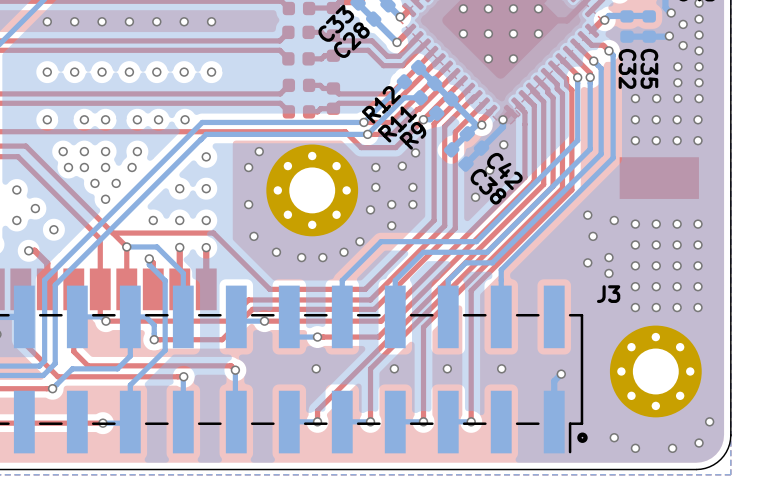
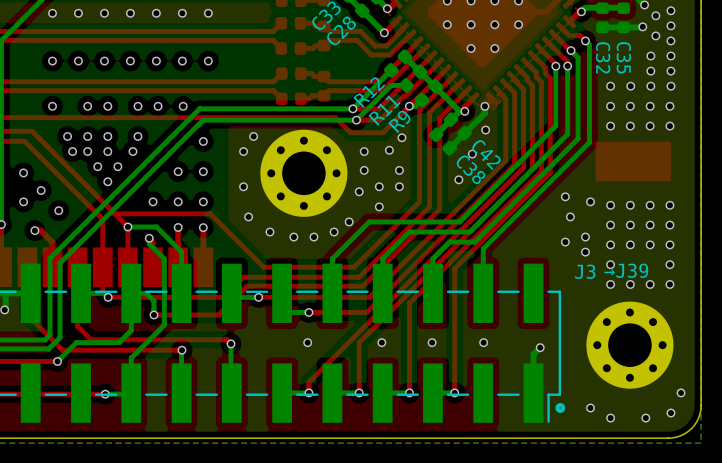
via: (656, 286) -> none
via: (677, 286) -> none
text: none -> →J39 (626, 270)

